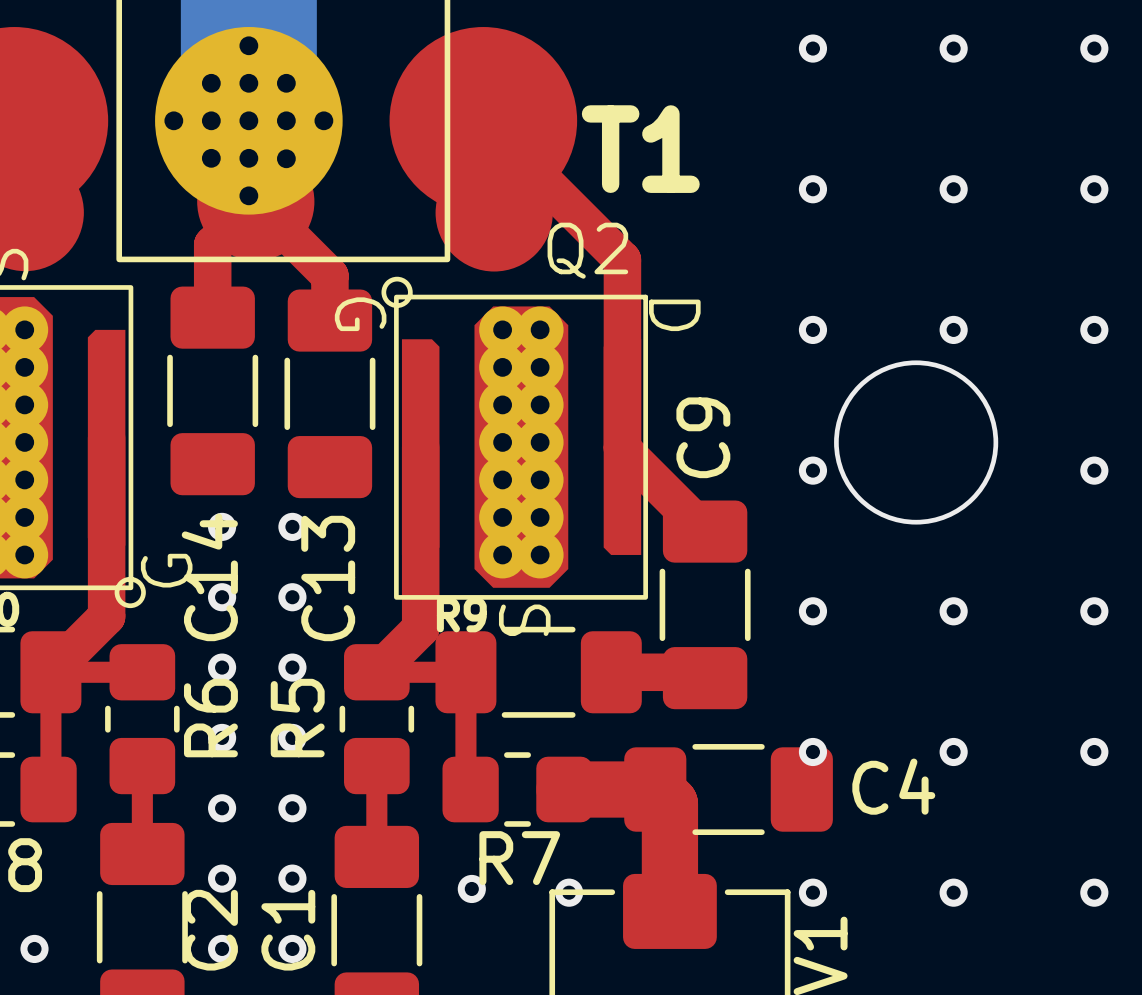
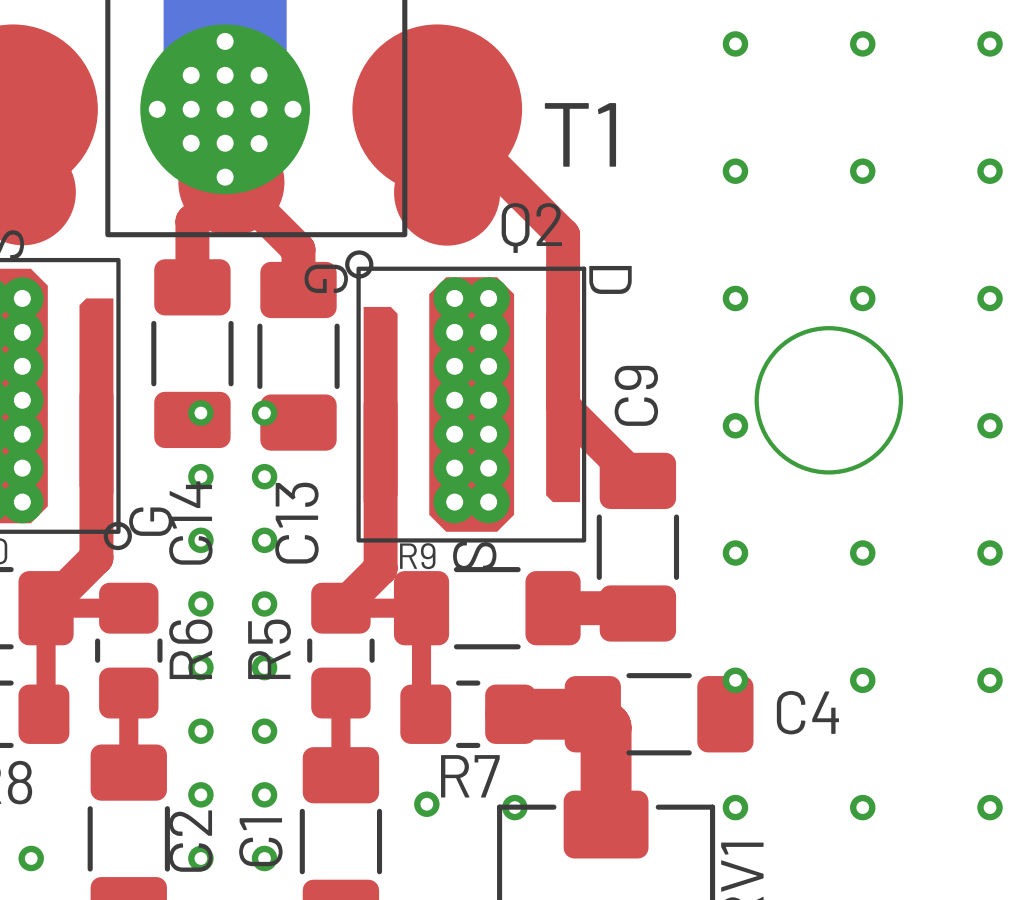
via: none -> (200, 413)
via: none -> (264, 413)

